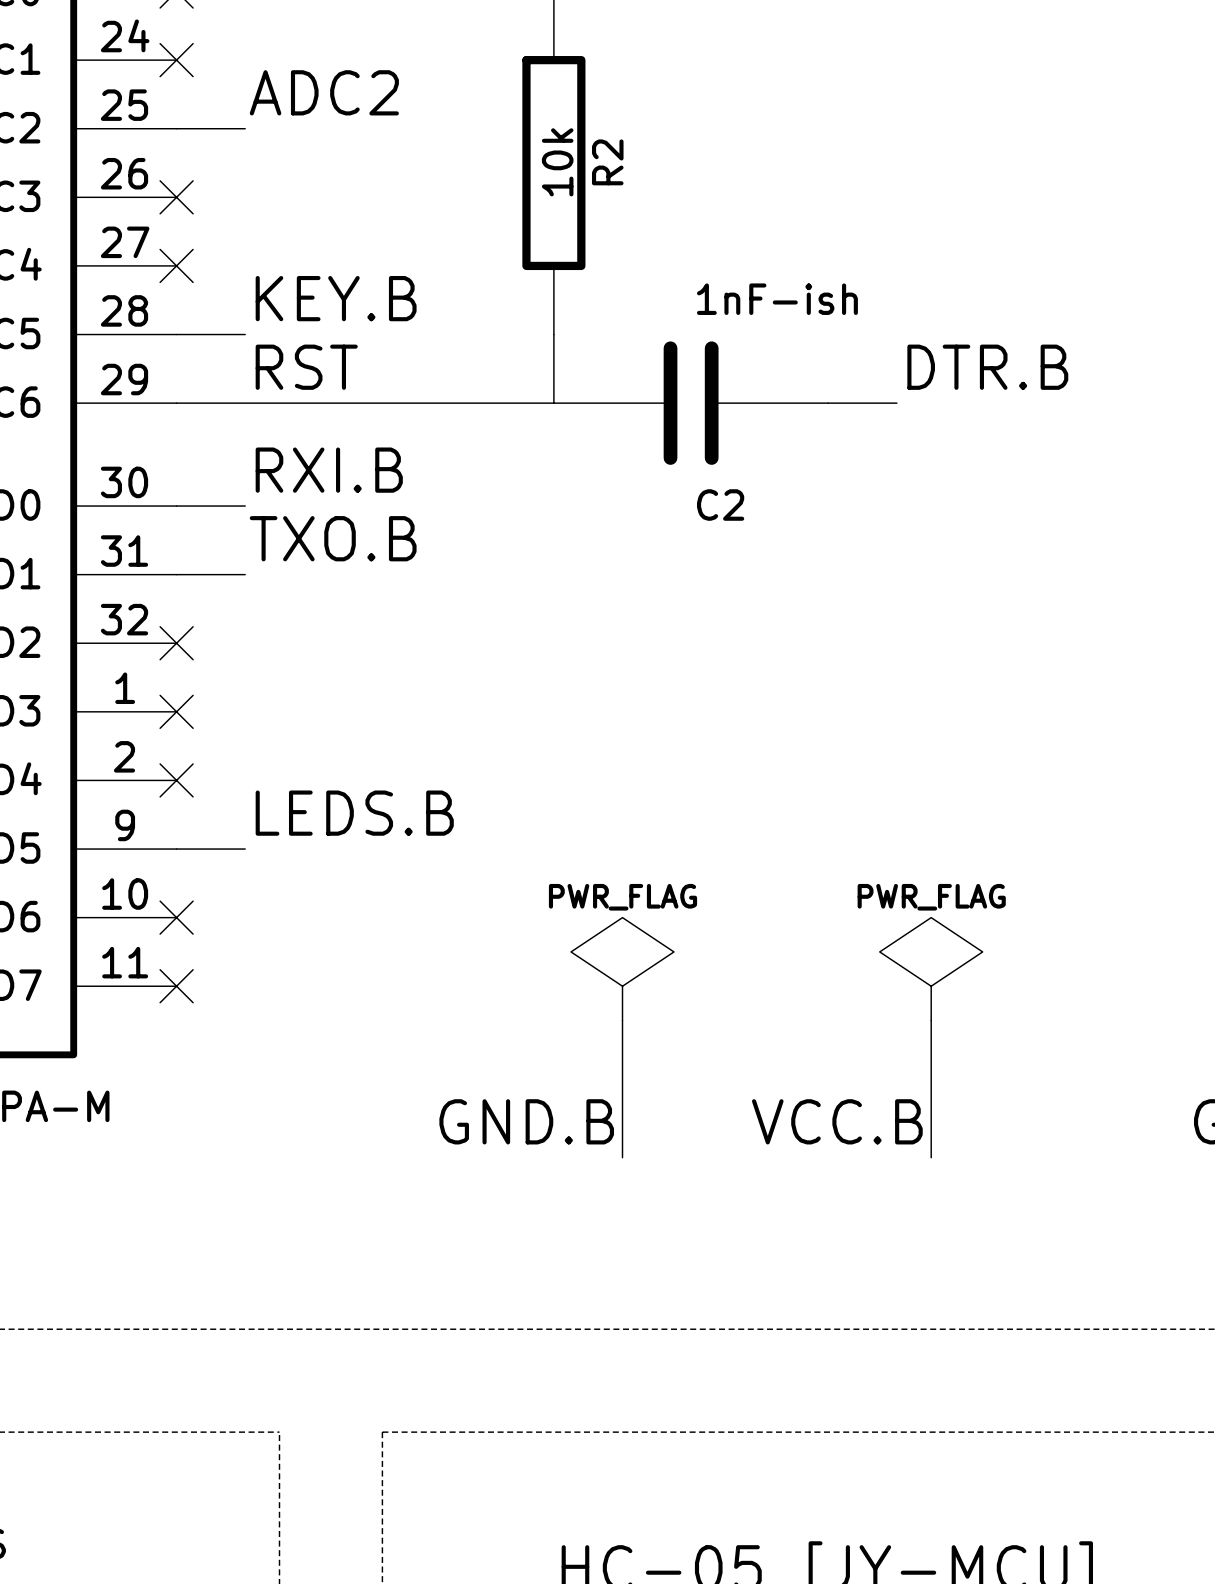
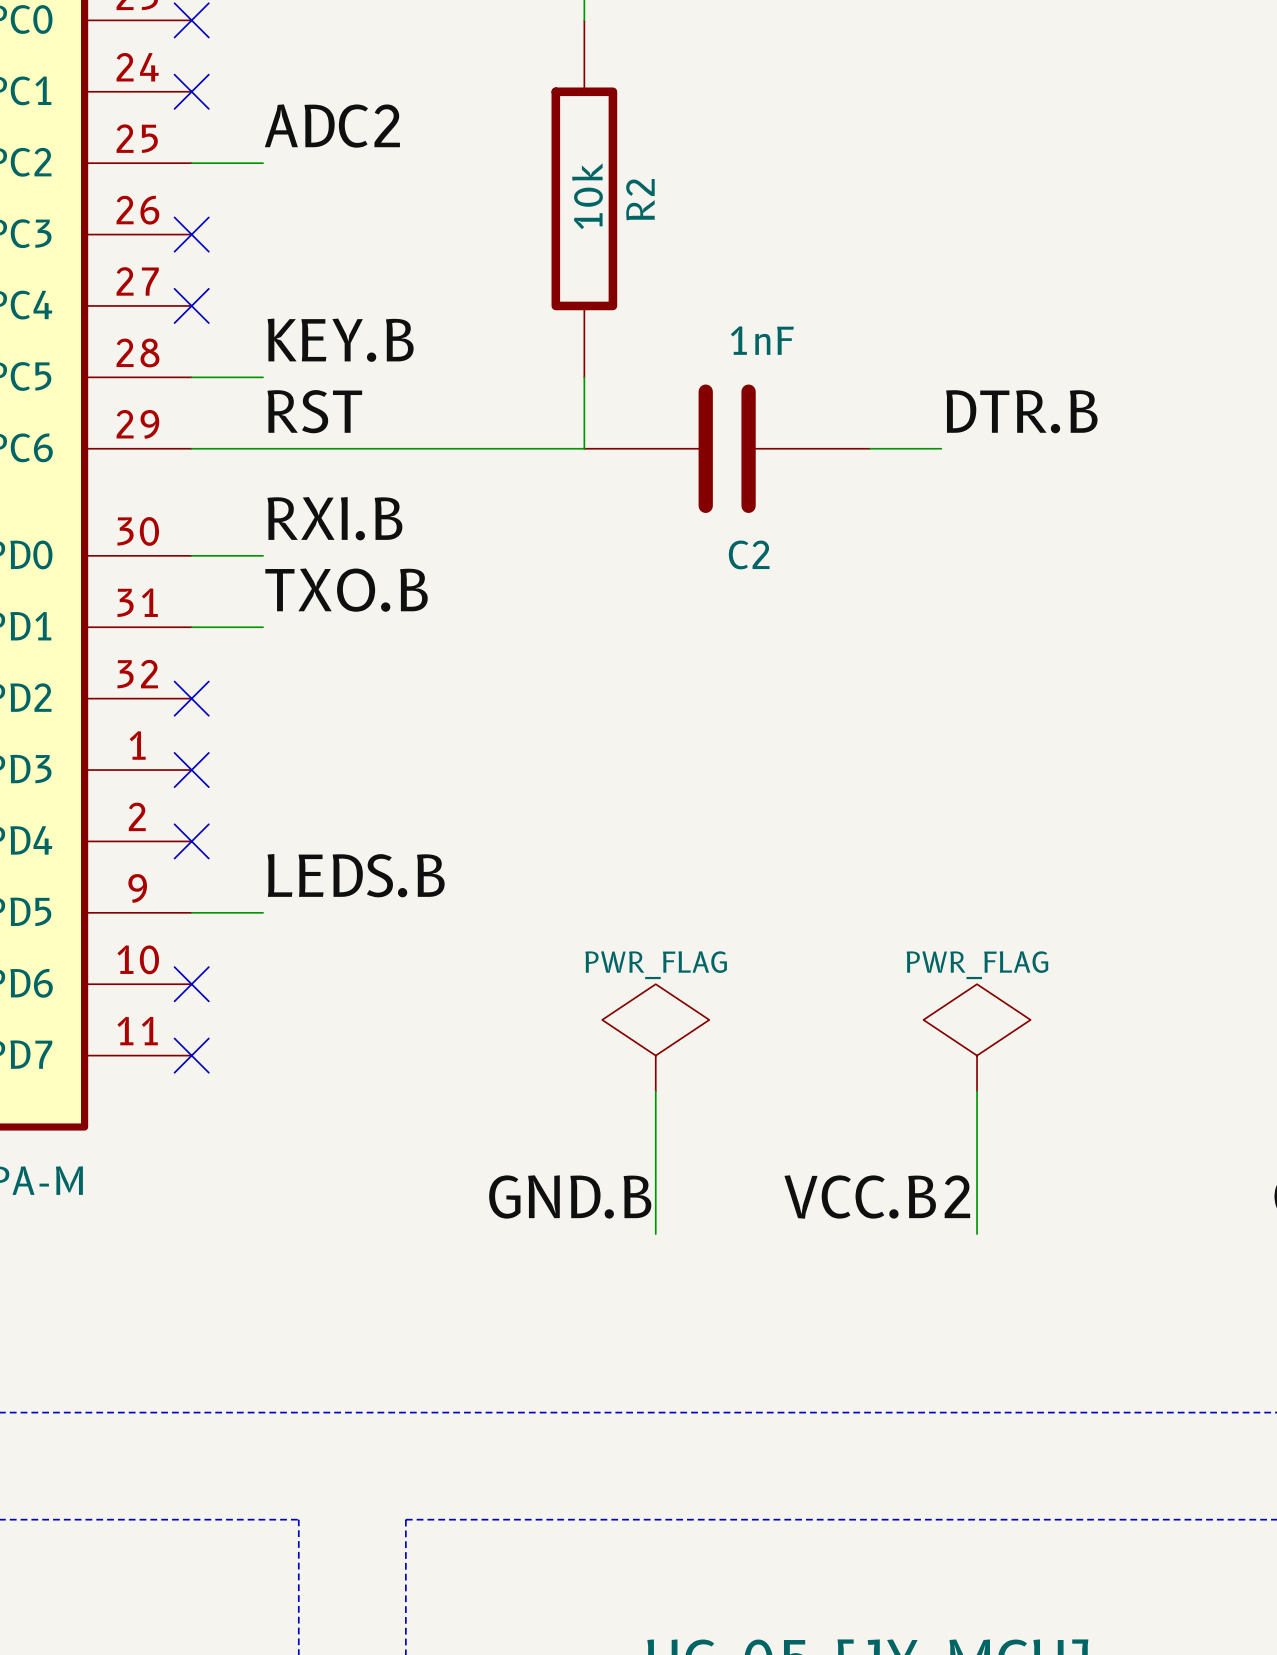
C2 value: 1nF-ish (777, 299) -> 1nF (762, 340)
label: VCC.B (837, 1121) -> VCC.B2 (877, 1197)

